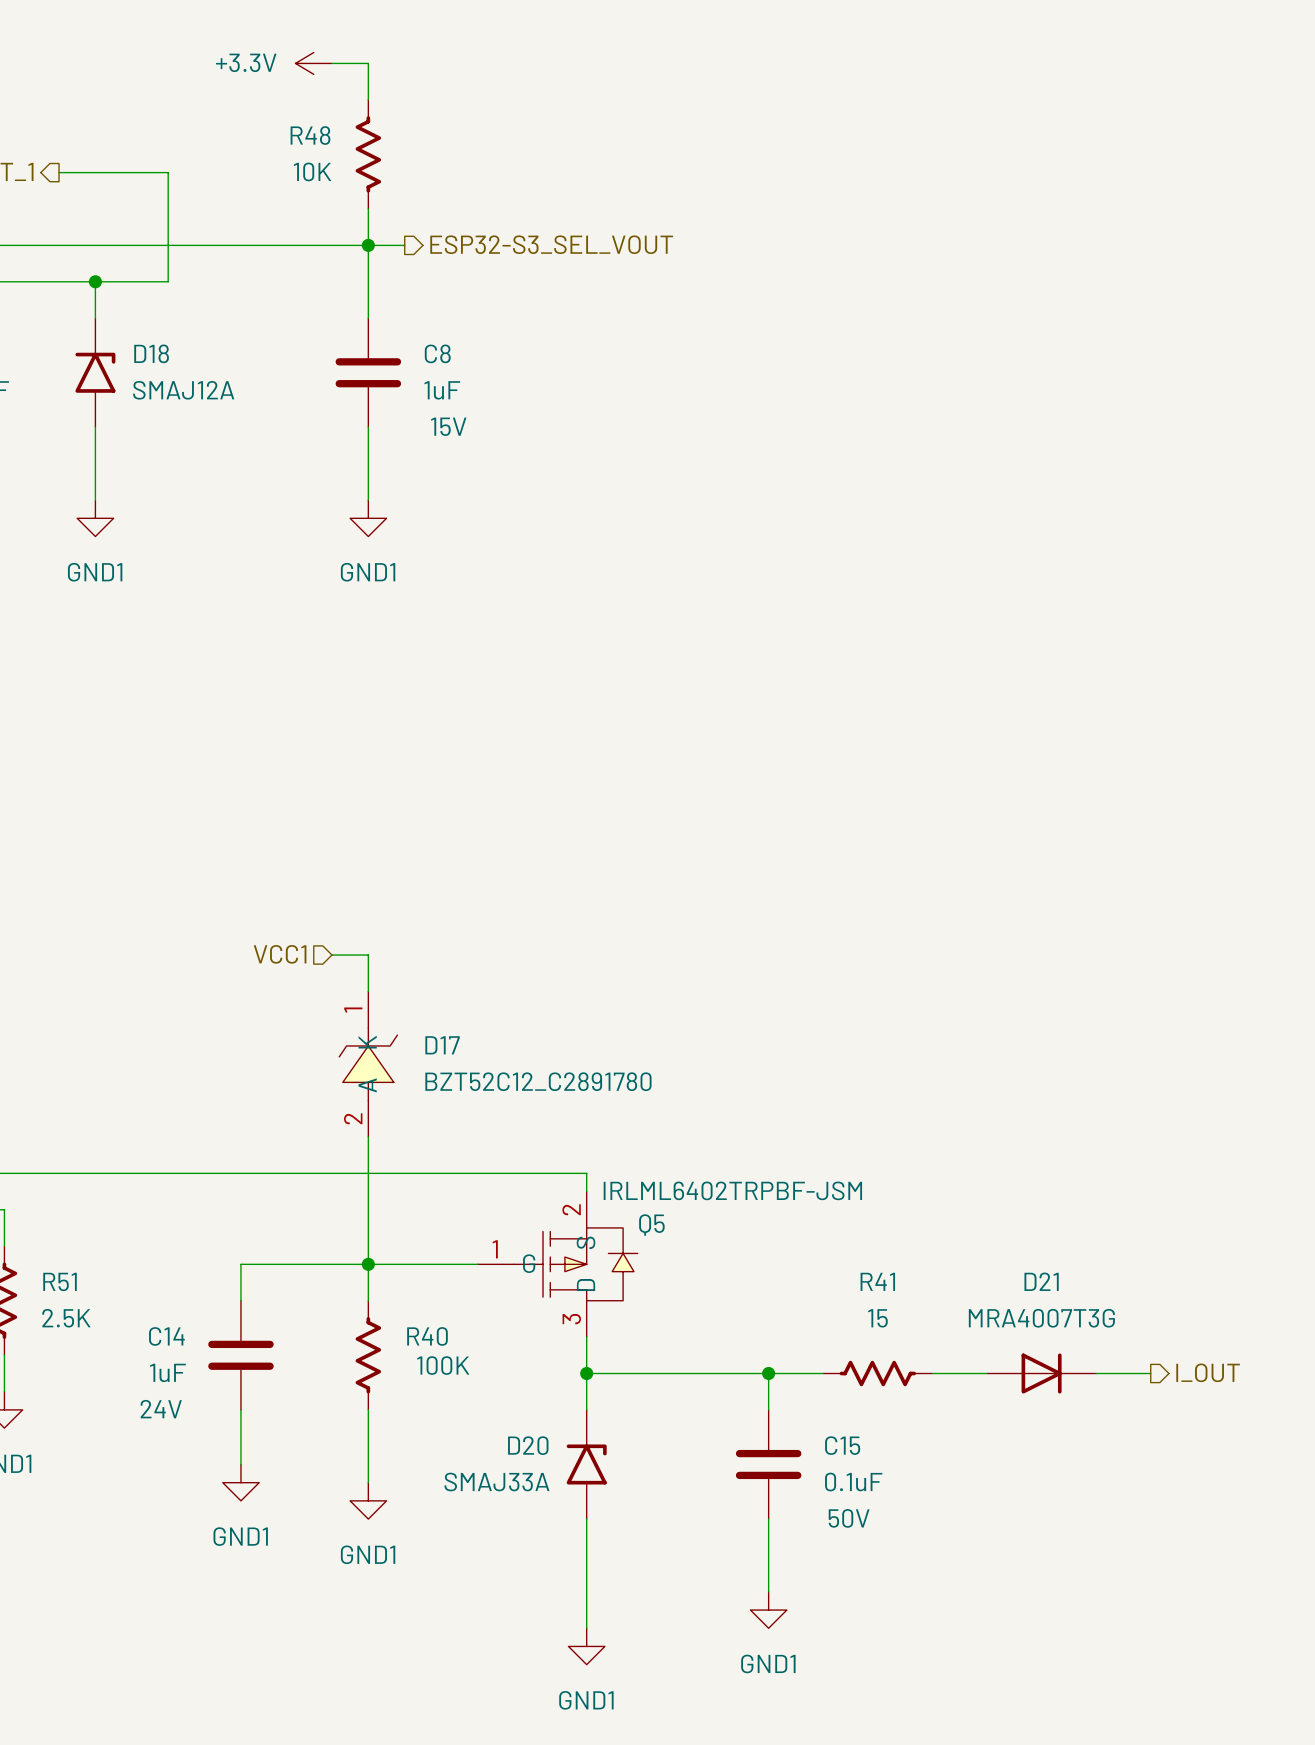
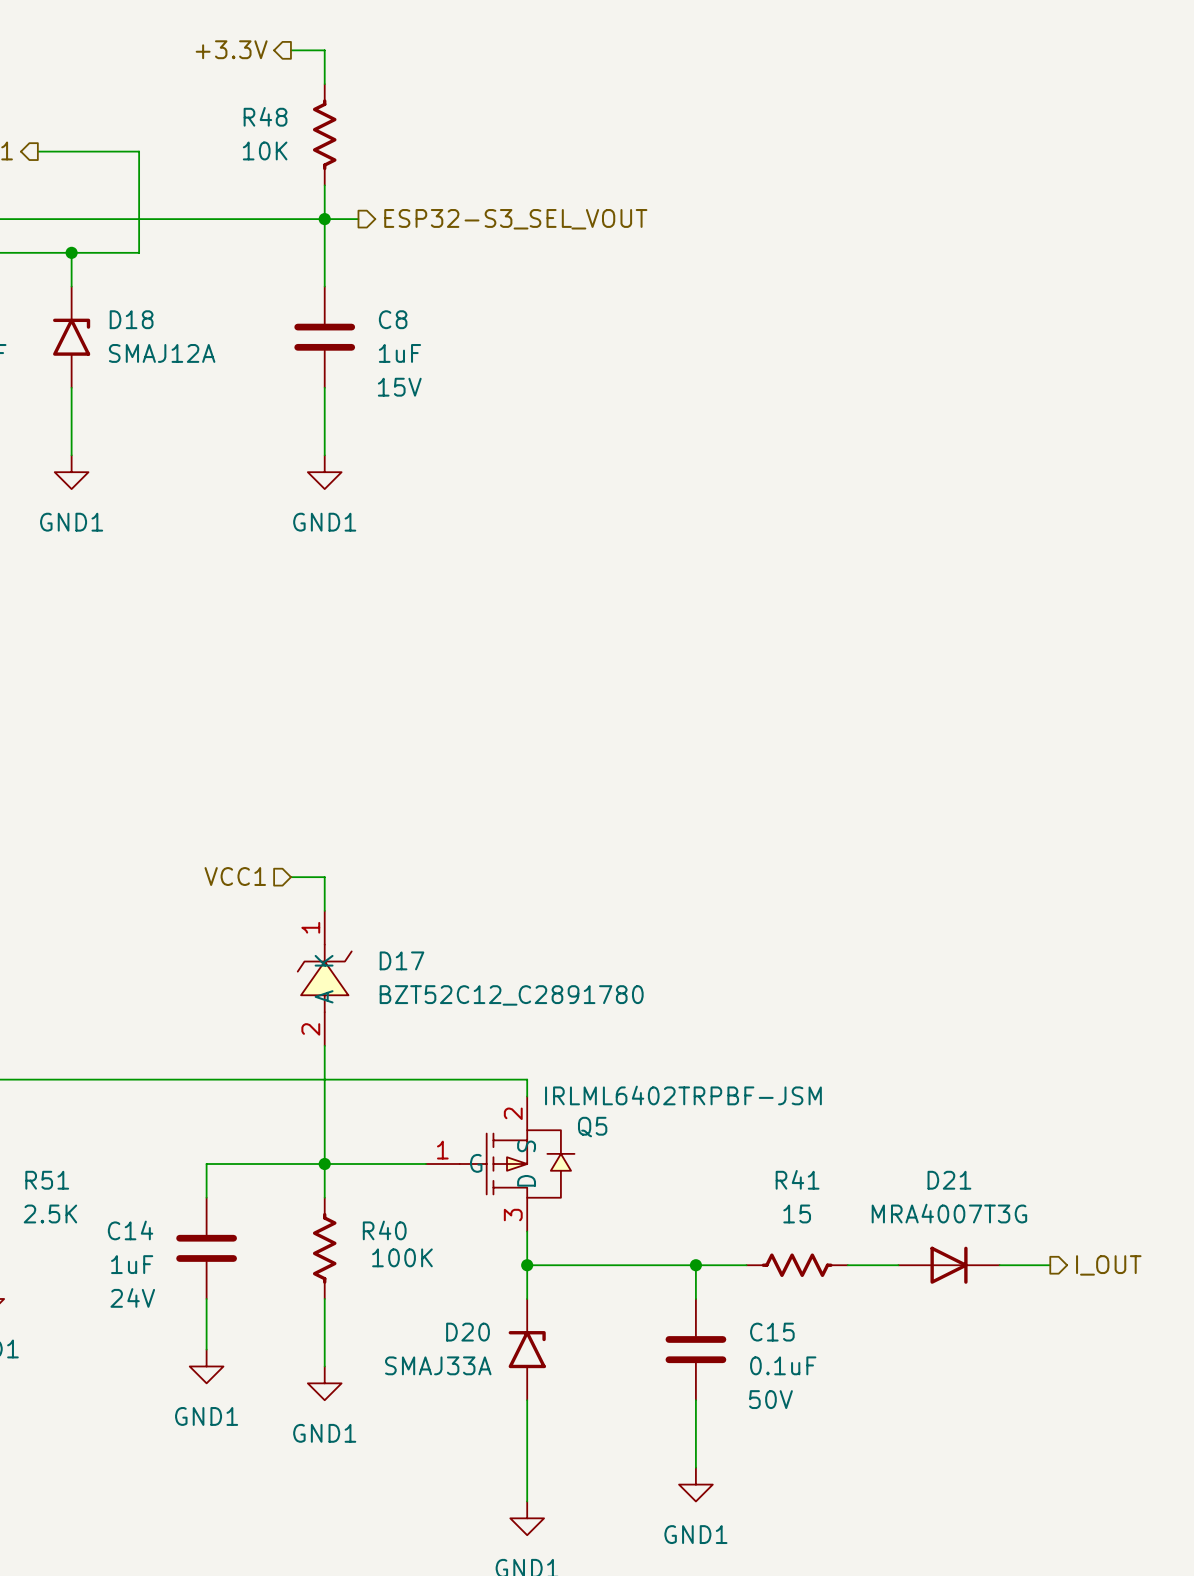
hierarchical label: none -> +3.3V (231, 49)
power symbol: +3.3V (313, 63) -> none

